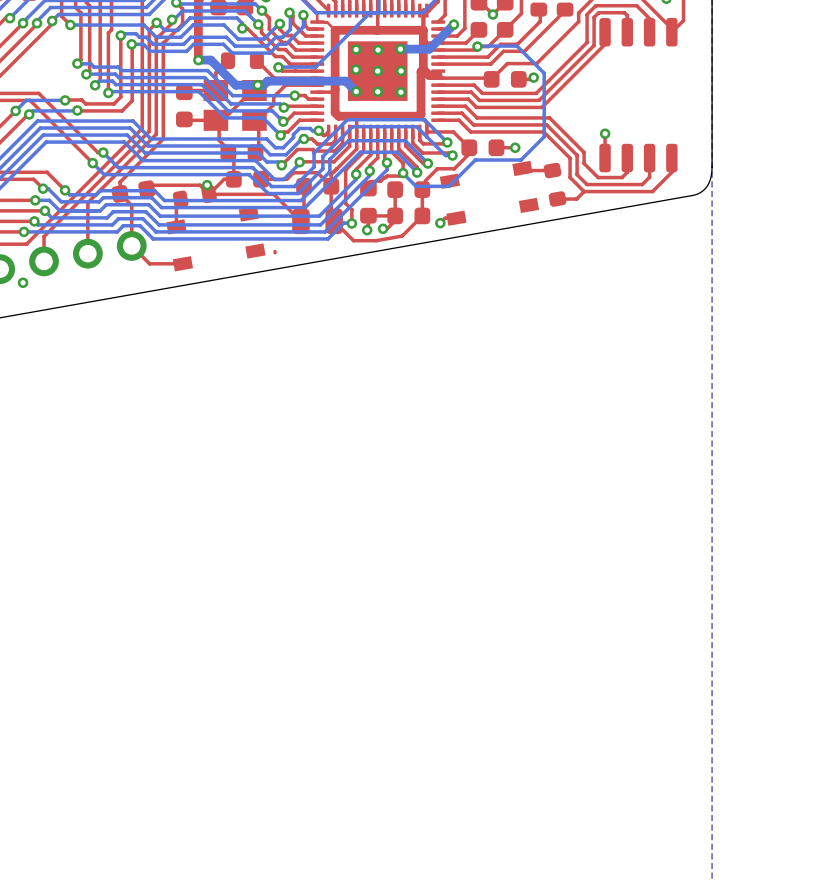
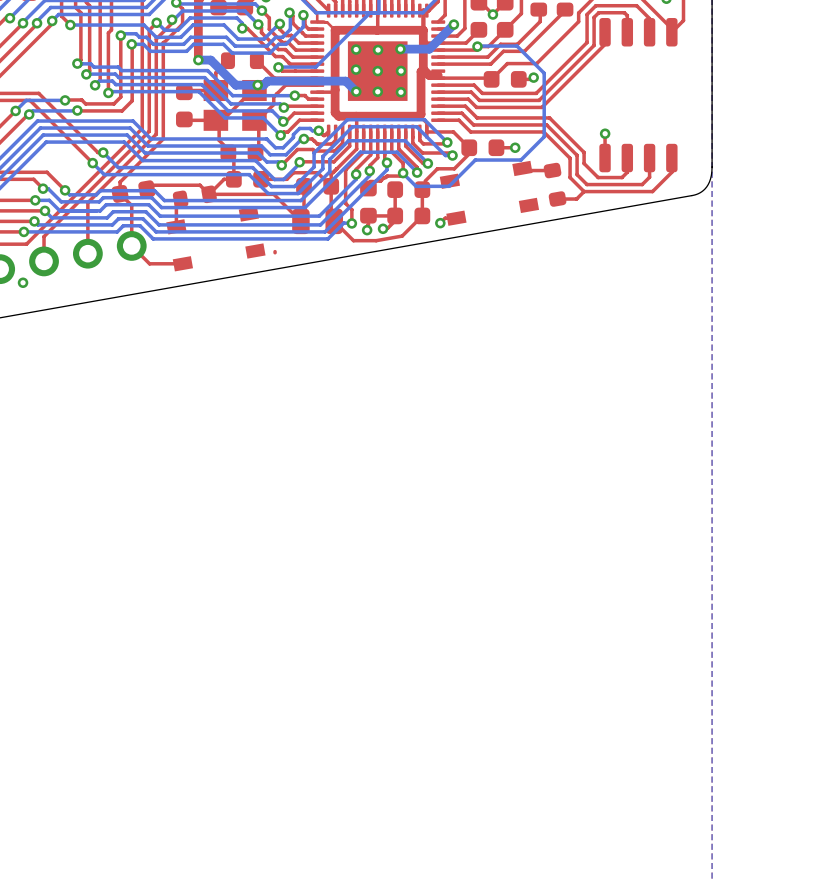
via: (207, 185) -> none

